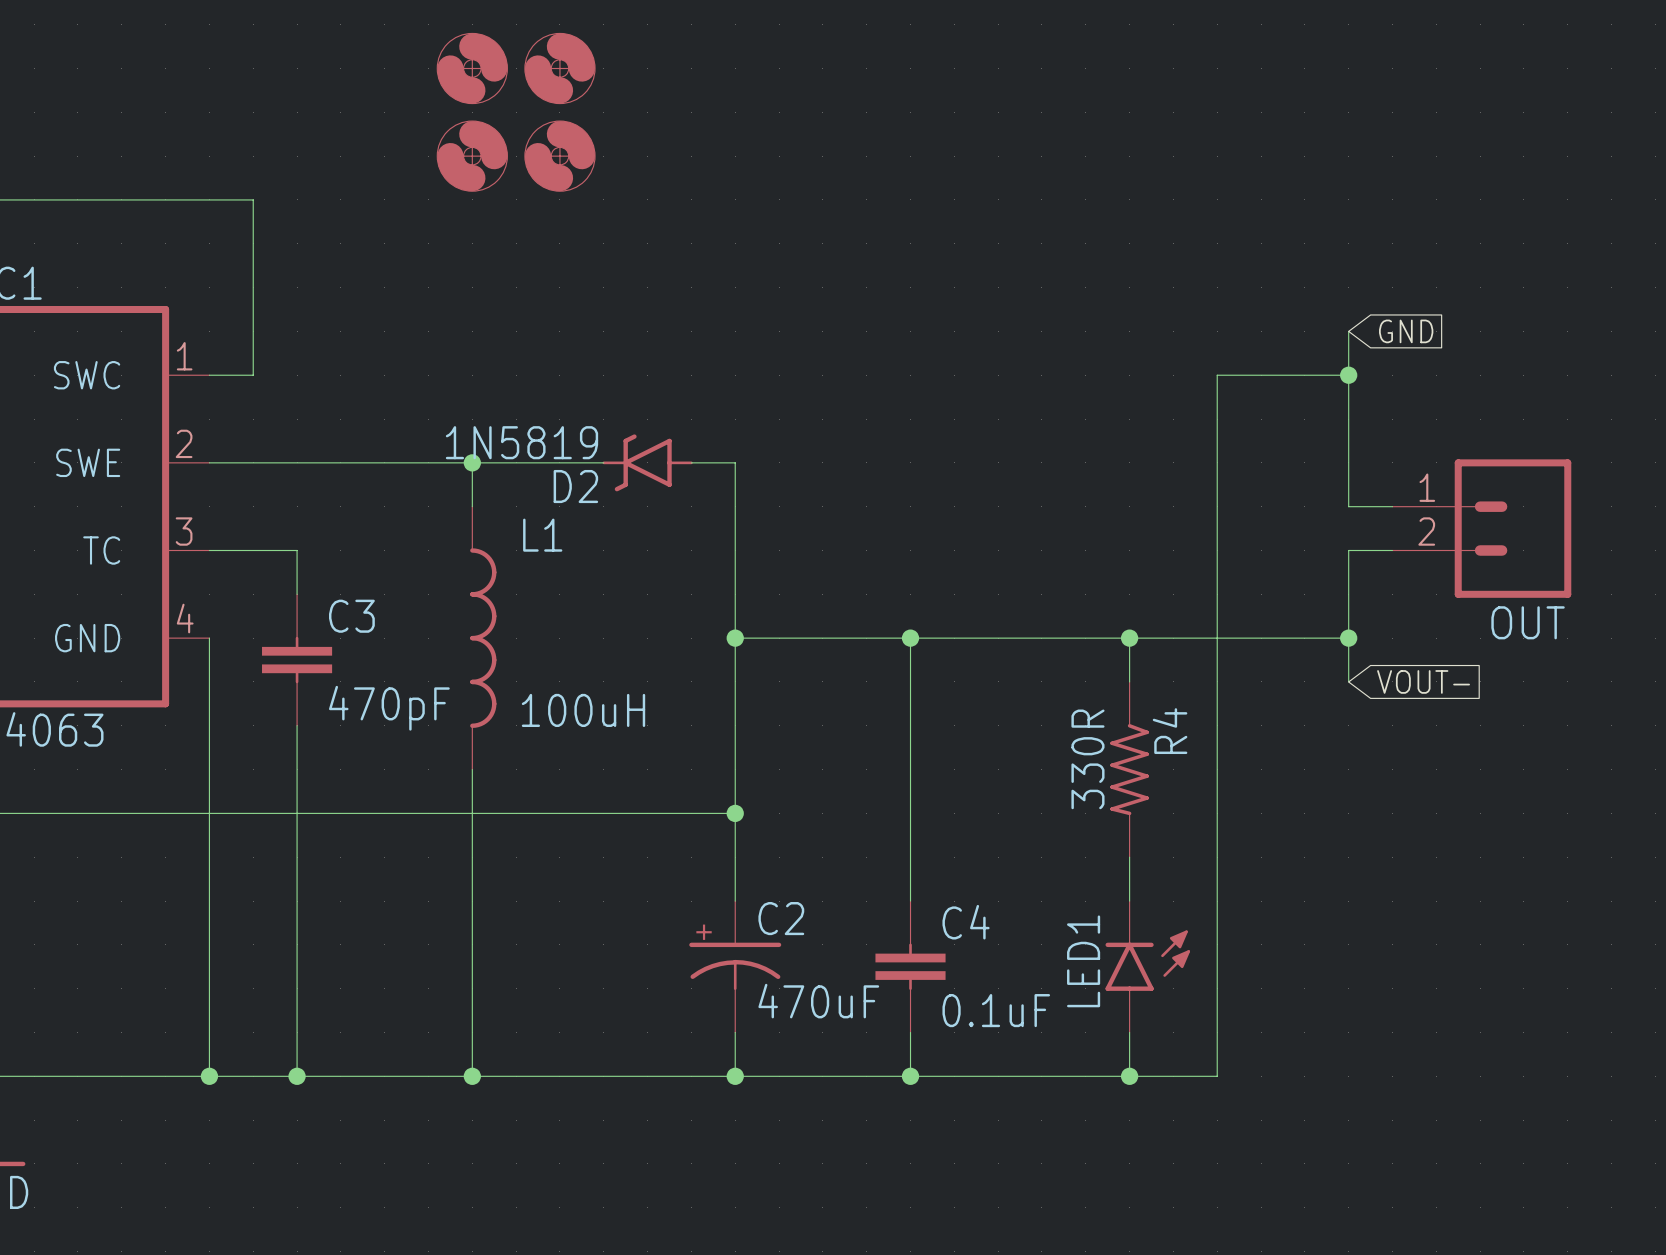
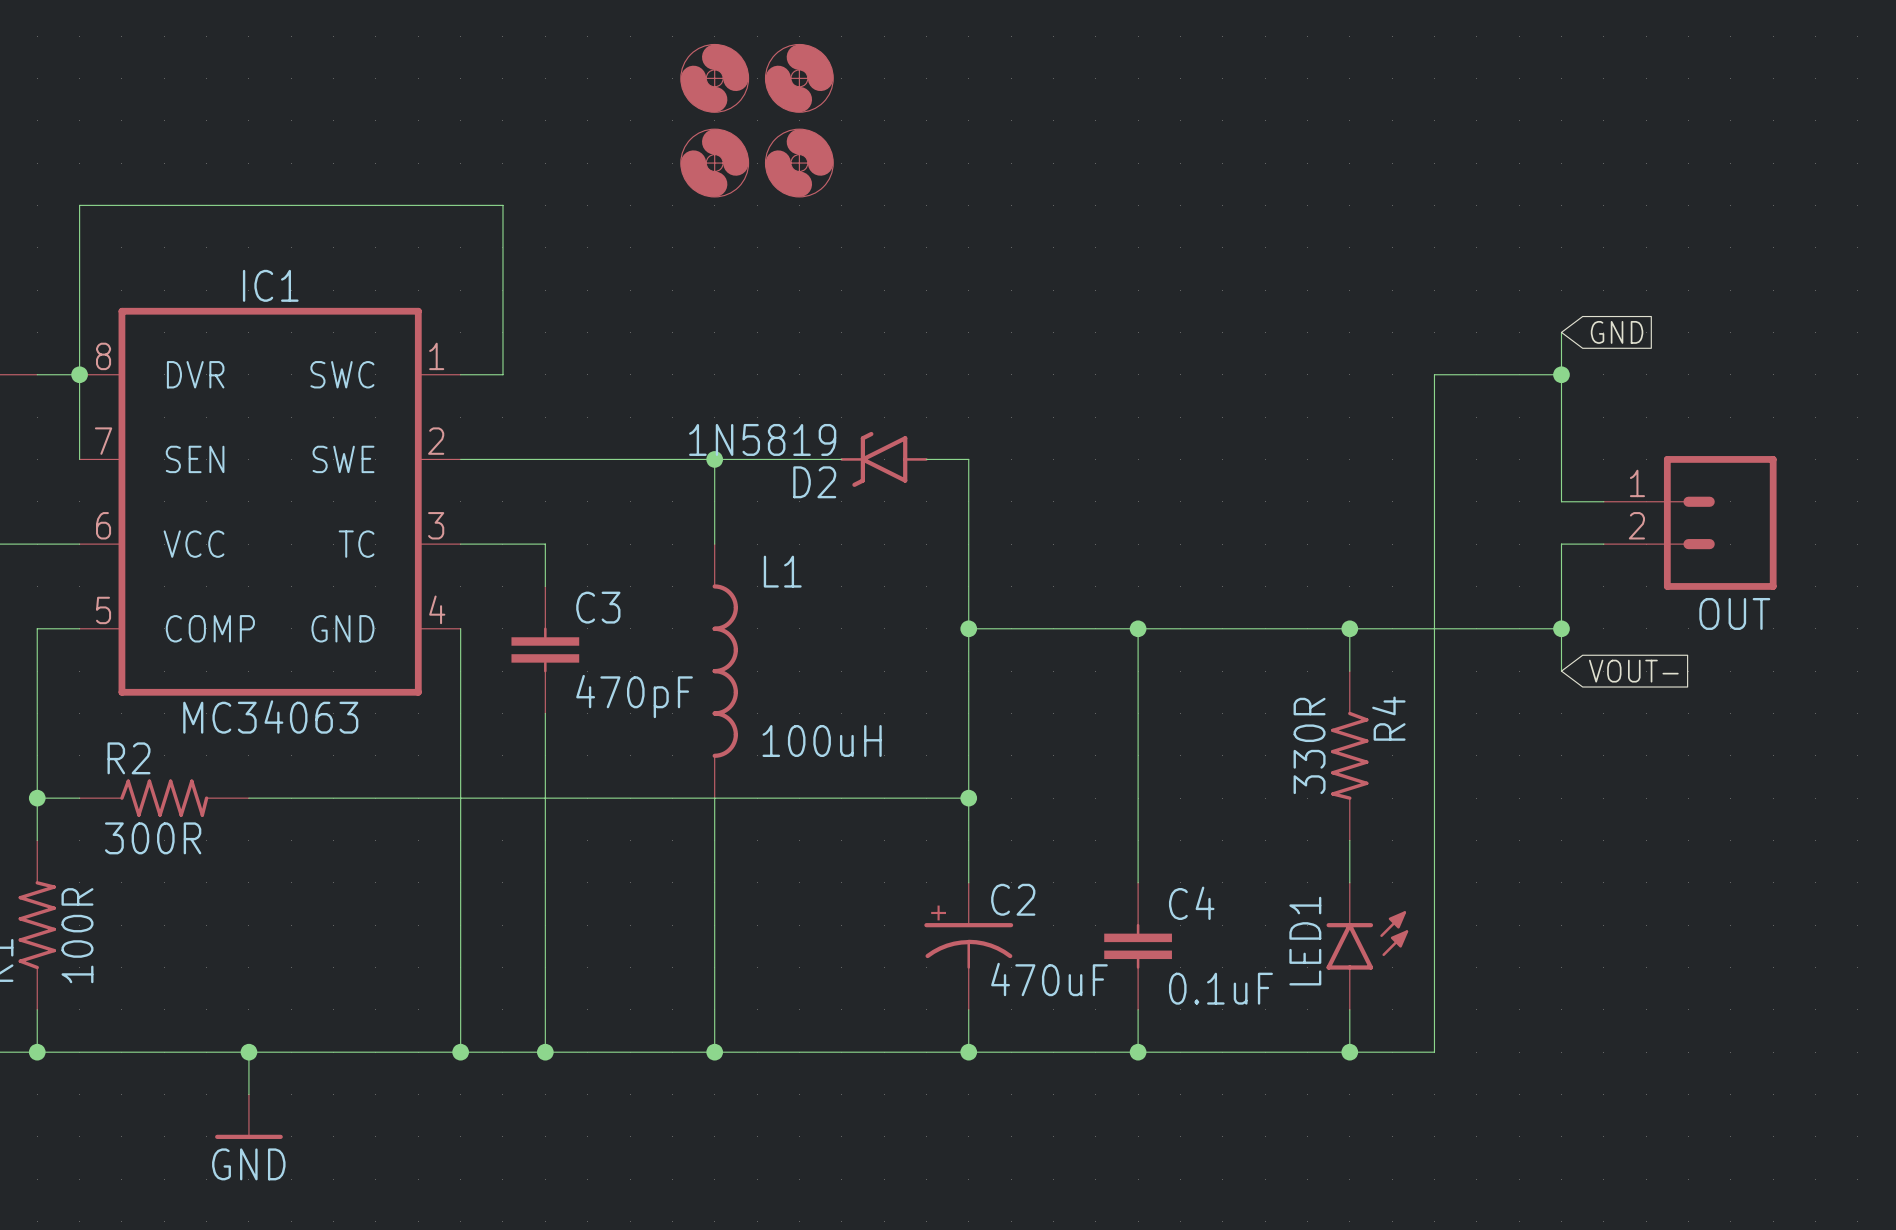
L1 position: (483, 638) -> (725, 671)

